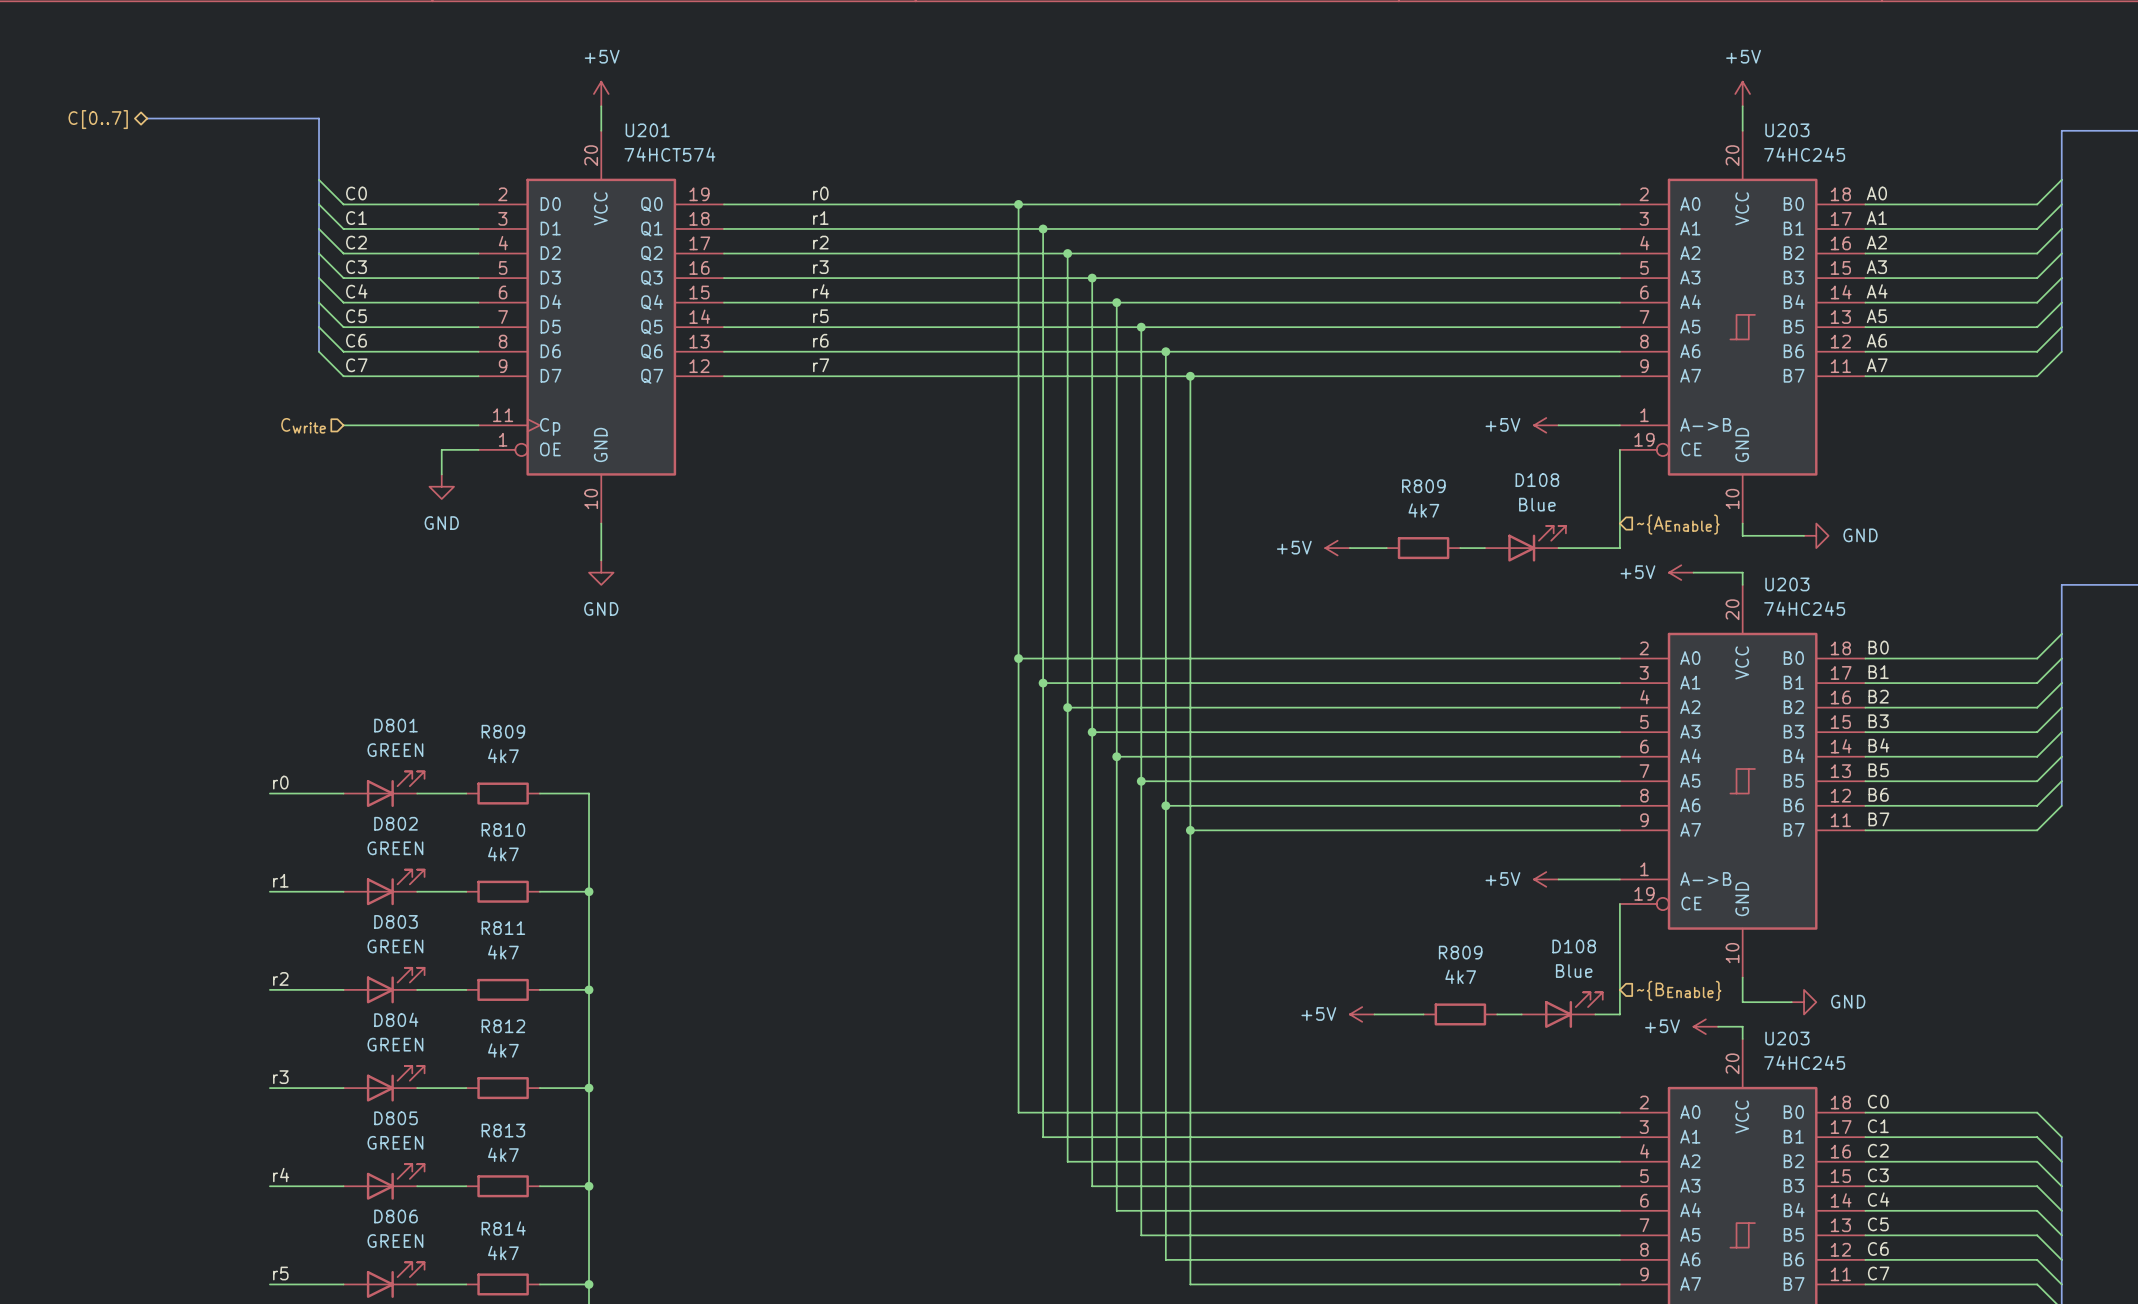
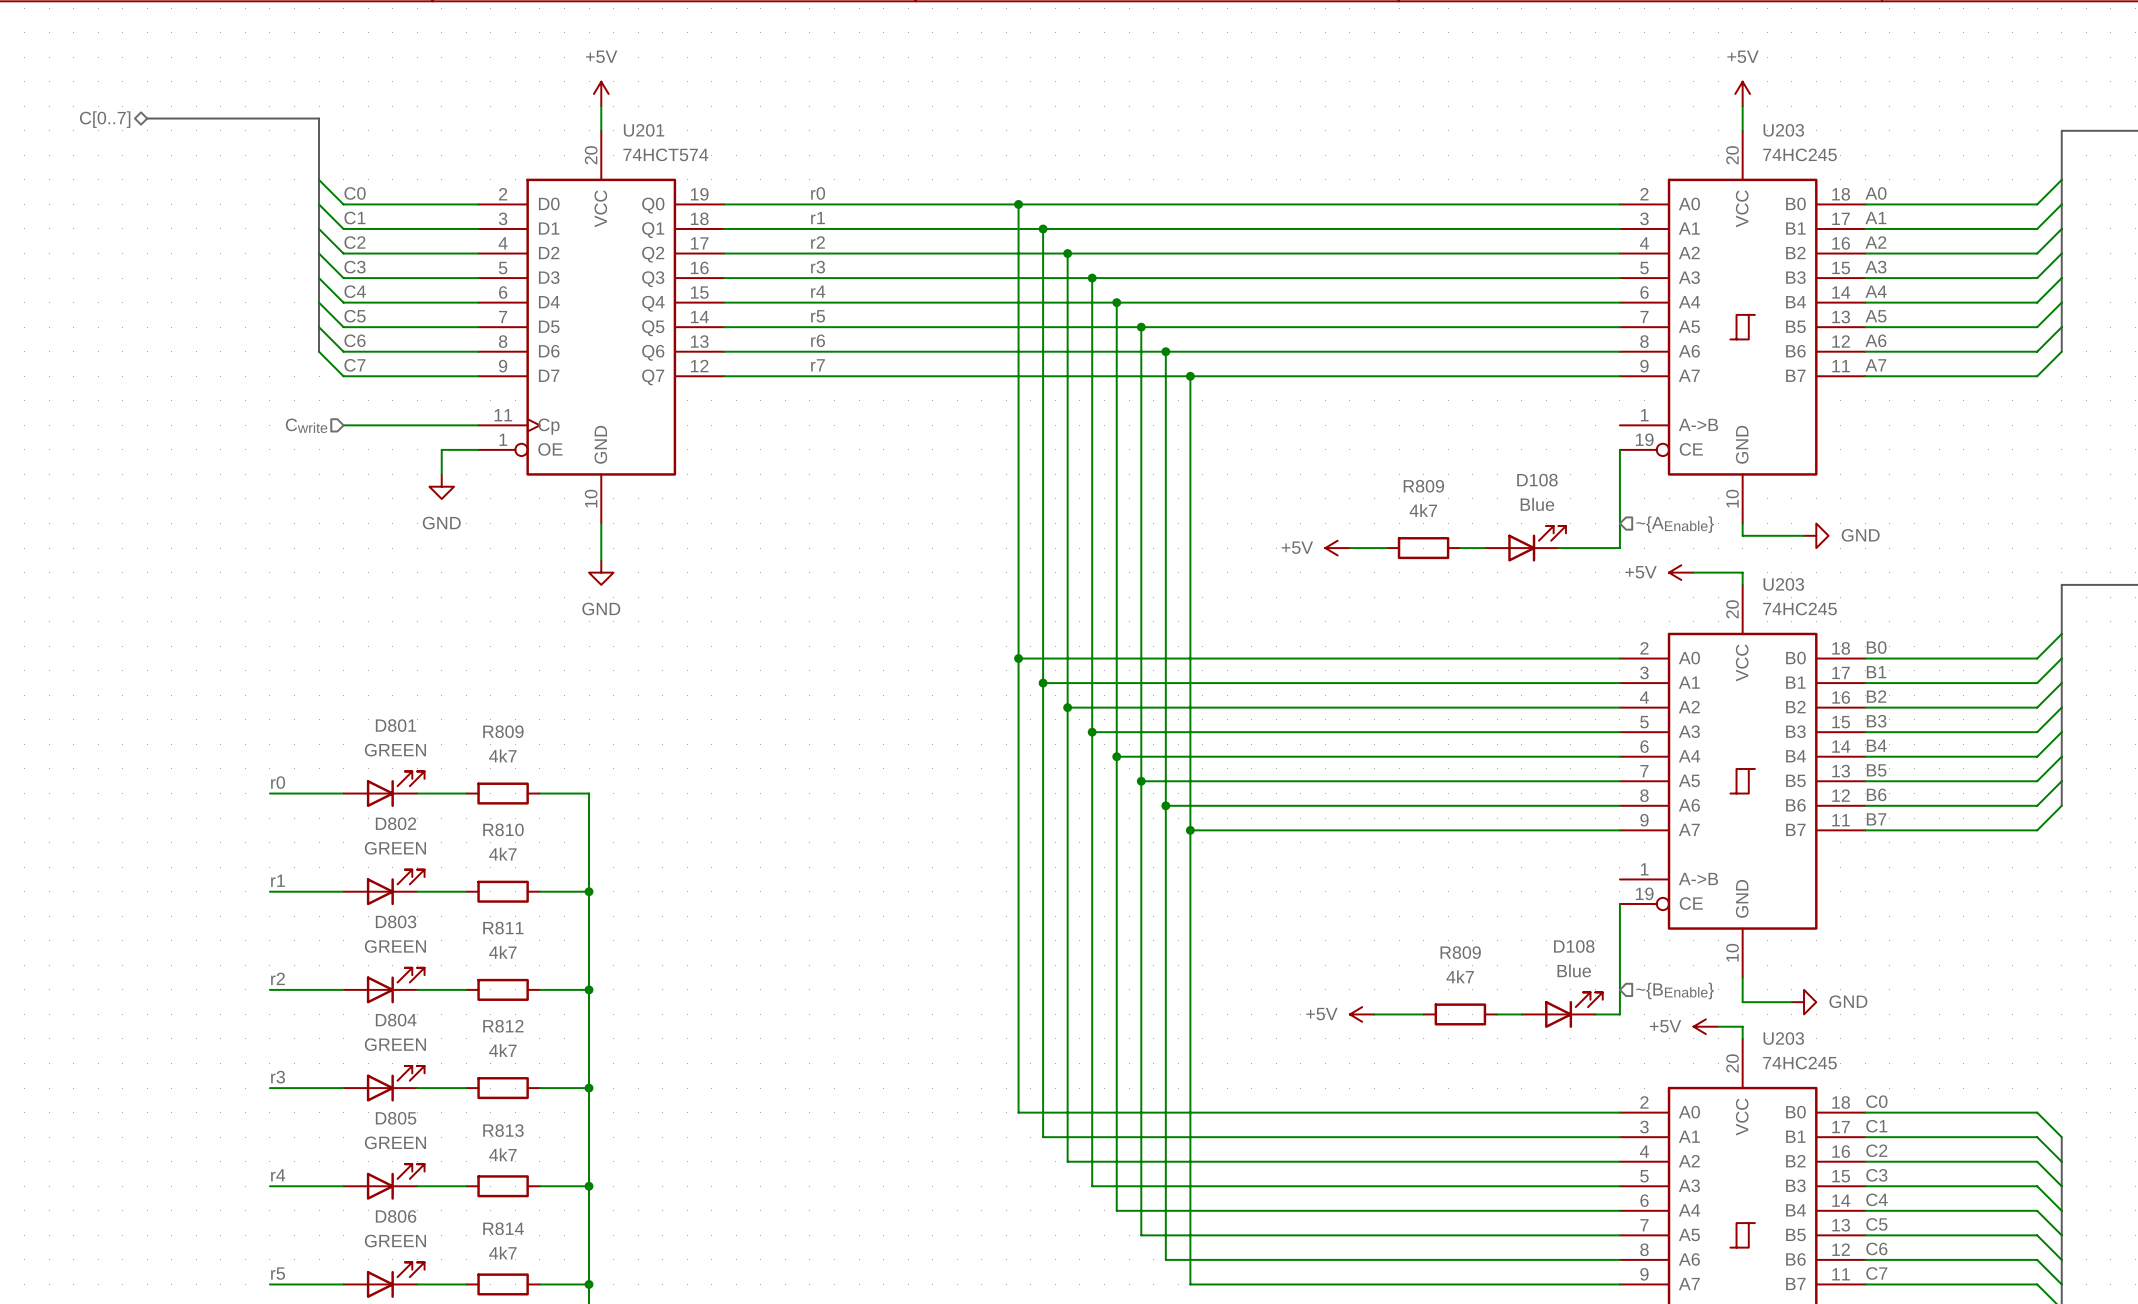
power symbol: +5V (1546, 425) -> none
wire: (1558, 425) (1619, 425) -> none
power symbol: +5V (1546, 879) -> none
wire: (1558, 879) (1619, 879) -> none

